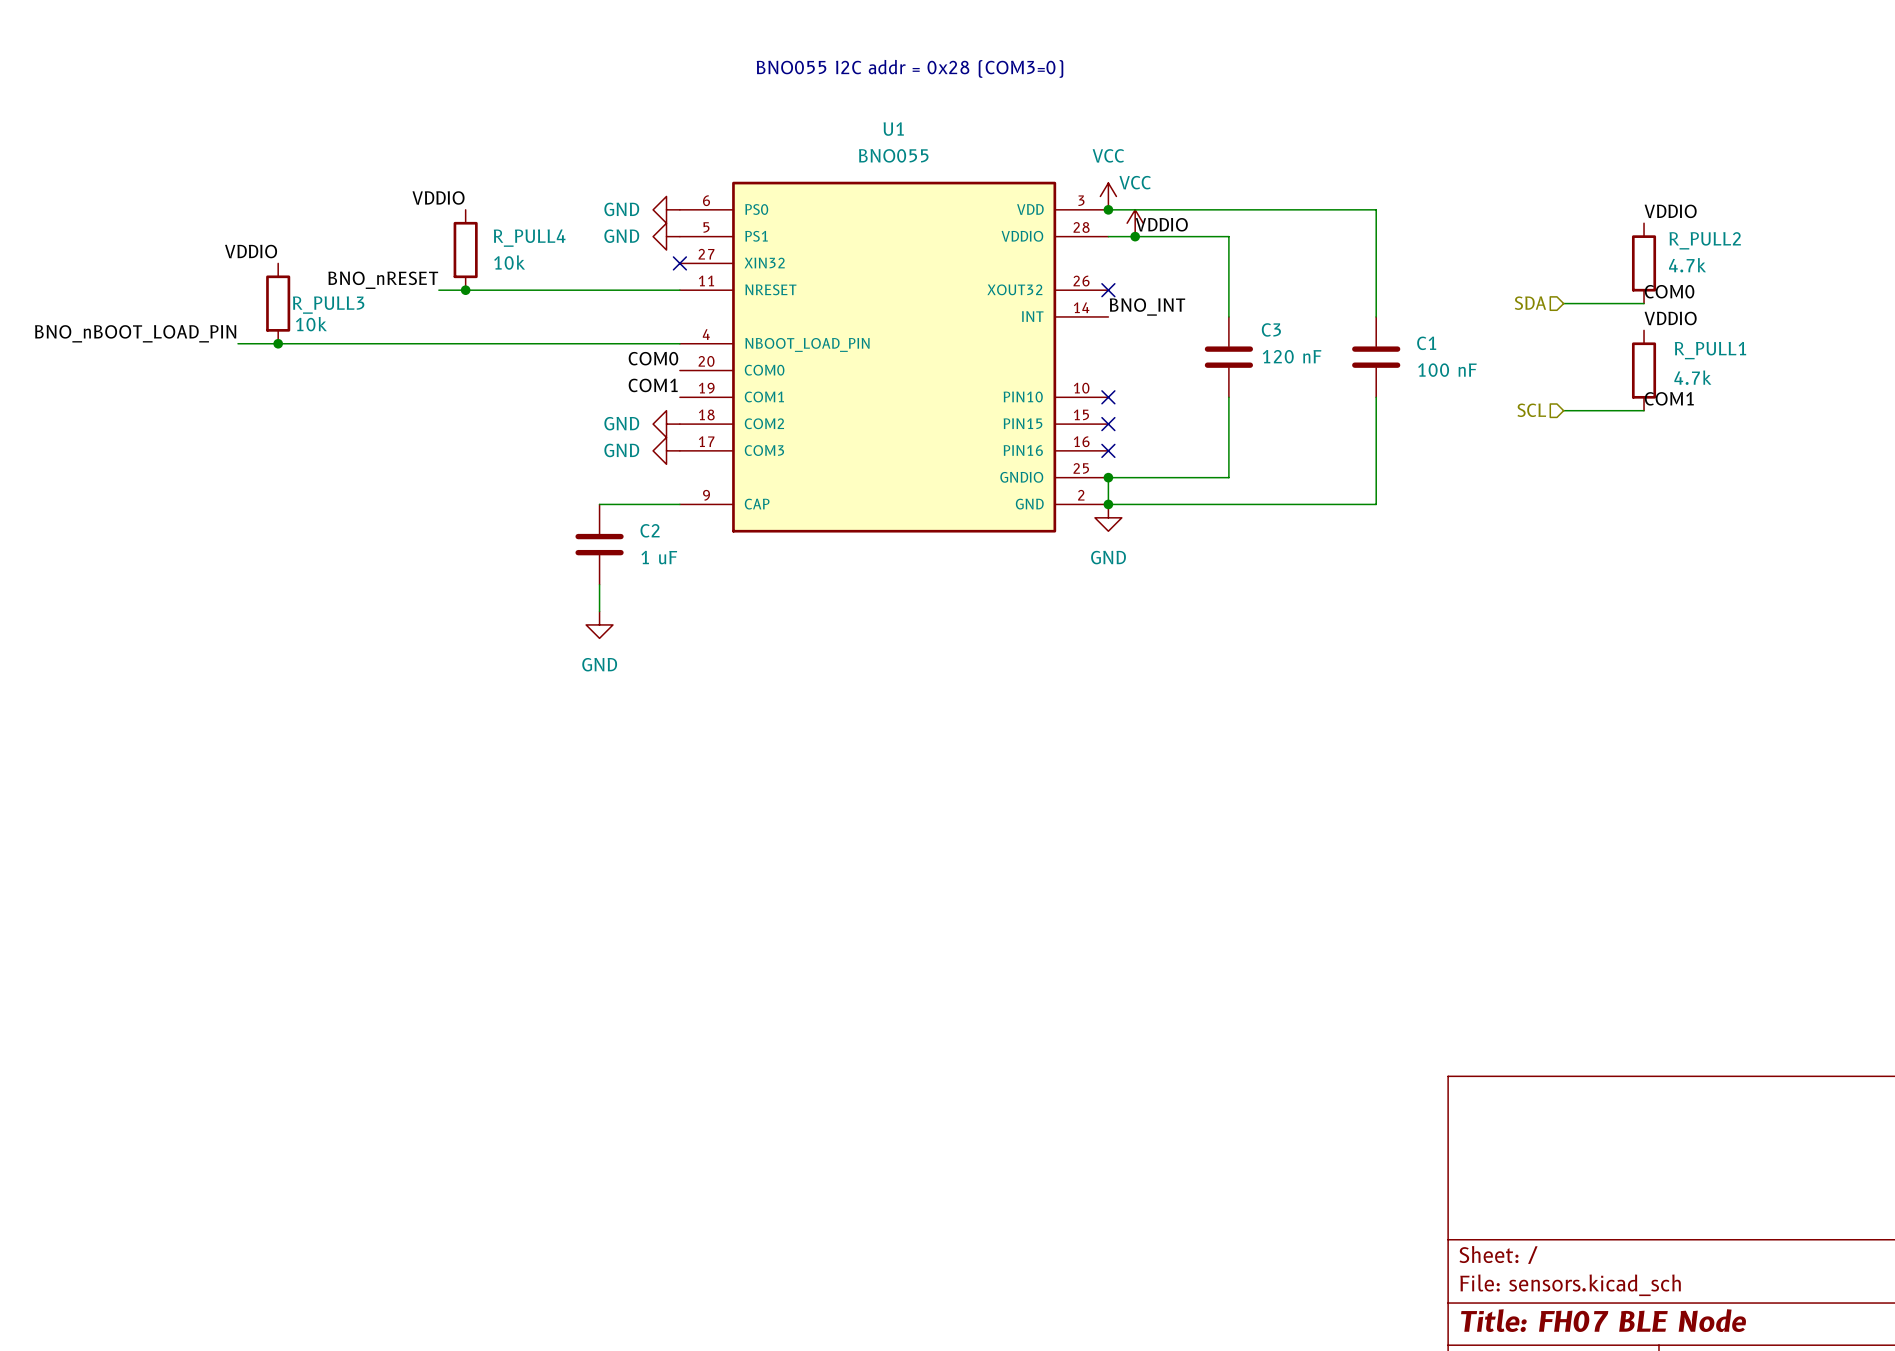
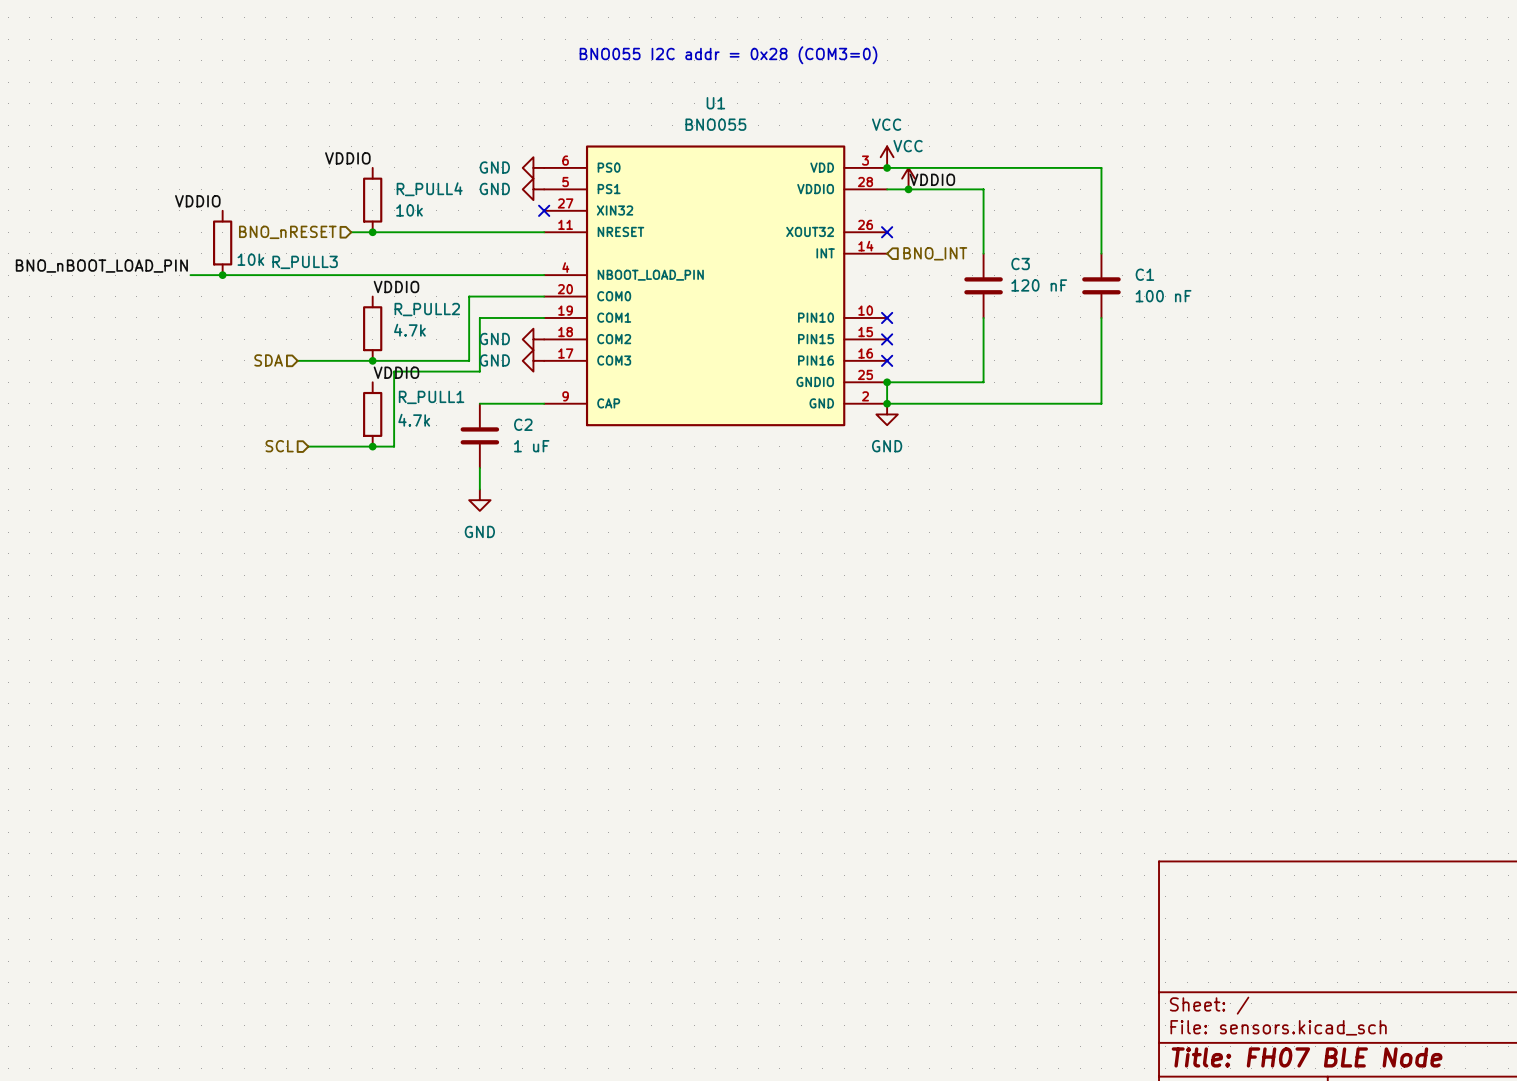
label: VDDIO (1670, 211) -> none
R_PULL2 position: (1644, 263) -> (372, 328)
label: BNO_nRESET (383, 280) -> none
hierarchical label: none -> BNO_nRESET (287, 232)
label: COM0 (1669, 291) -> none
hierarchical label: SDA (1530, 303) -> none
wire: (1563, 303) (1644, 303) -> none
R_PULL3 name position: R_PULL3 (328, 305) -> R_PULL3 (305, 262)
label: BNO_INT (1147, 307) -> none
hierarchical label: none -> BNO_INT (935, 253)
label: VDDIO (1670, 318) -> none
label: none -> VDDIO (396, 286)
label: COM0 (653, 358) -> none
wire: none -> (544, 296) (469, 296) (469, 360) (297, 360)
R_PULL1 position: (1644, 370) -> (372, 414)
label: COM1 (653, 385) -> none
wire: none -> (544, 317) (479, 317) (479, 371) (394, 371) (394, 446) (308, 446)
label: COM1 (1669, 398) -> none
hierarchical label: SCL (1531, 410) -> none
wire: (1563, 410) (1644, 410) -> none
hierarchical label: none -> SDA (268, 360)
junction: none -> (372, 360)
label: none -> VDDIO (396, 372)
hierarchical label: none -> SCL (279, 446)
junction: none -> (372, 446)

